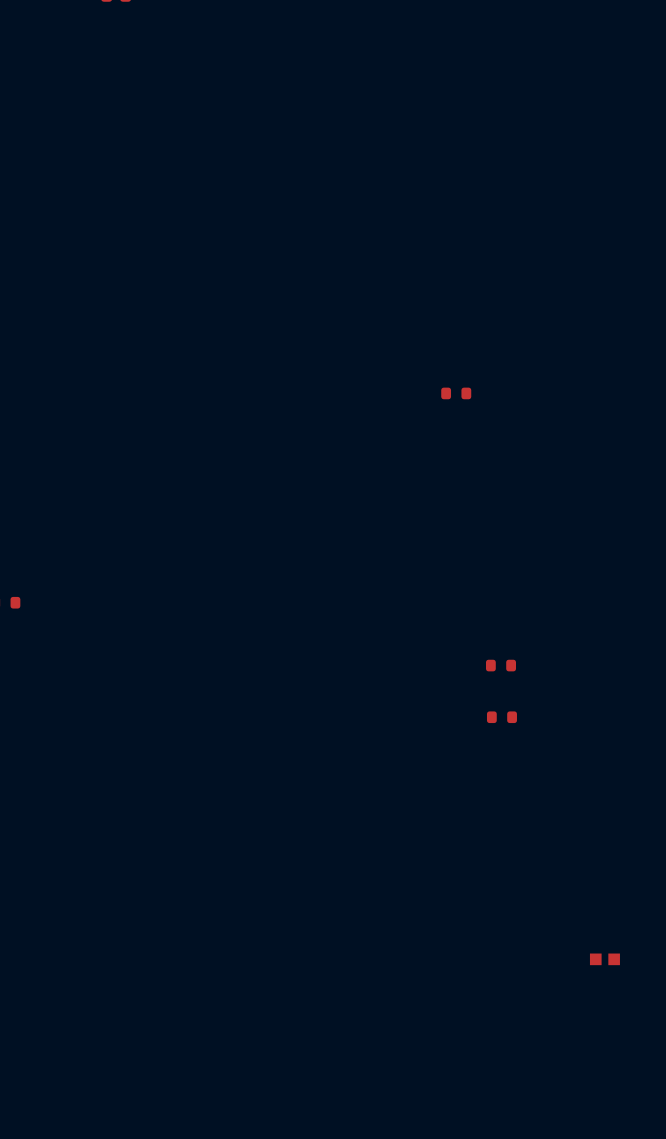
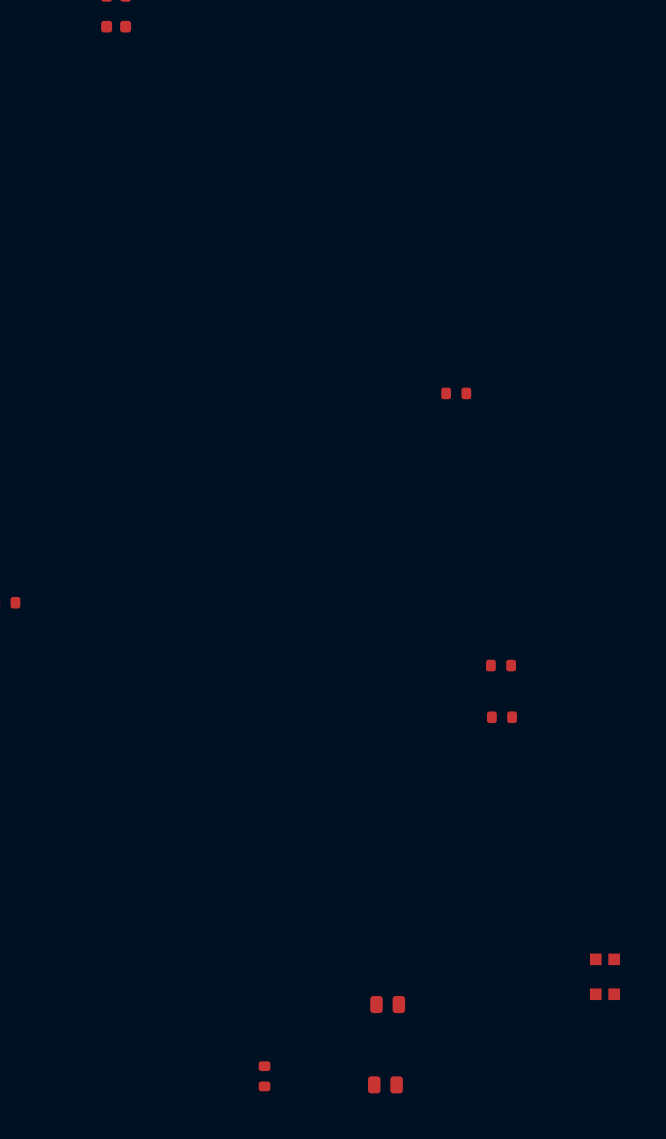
part: none -> (116, 26)
part: none -> (604, 994)
part: none -> (387, 1004)
part: none -> (264, 1076)
part: none -> (385, 1084)

